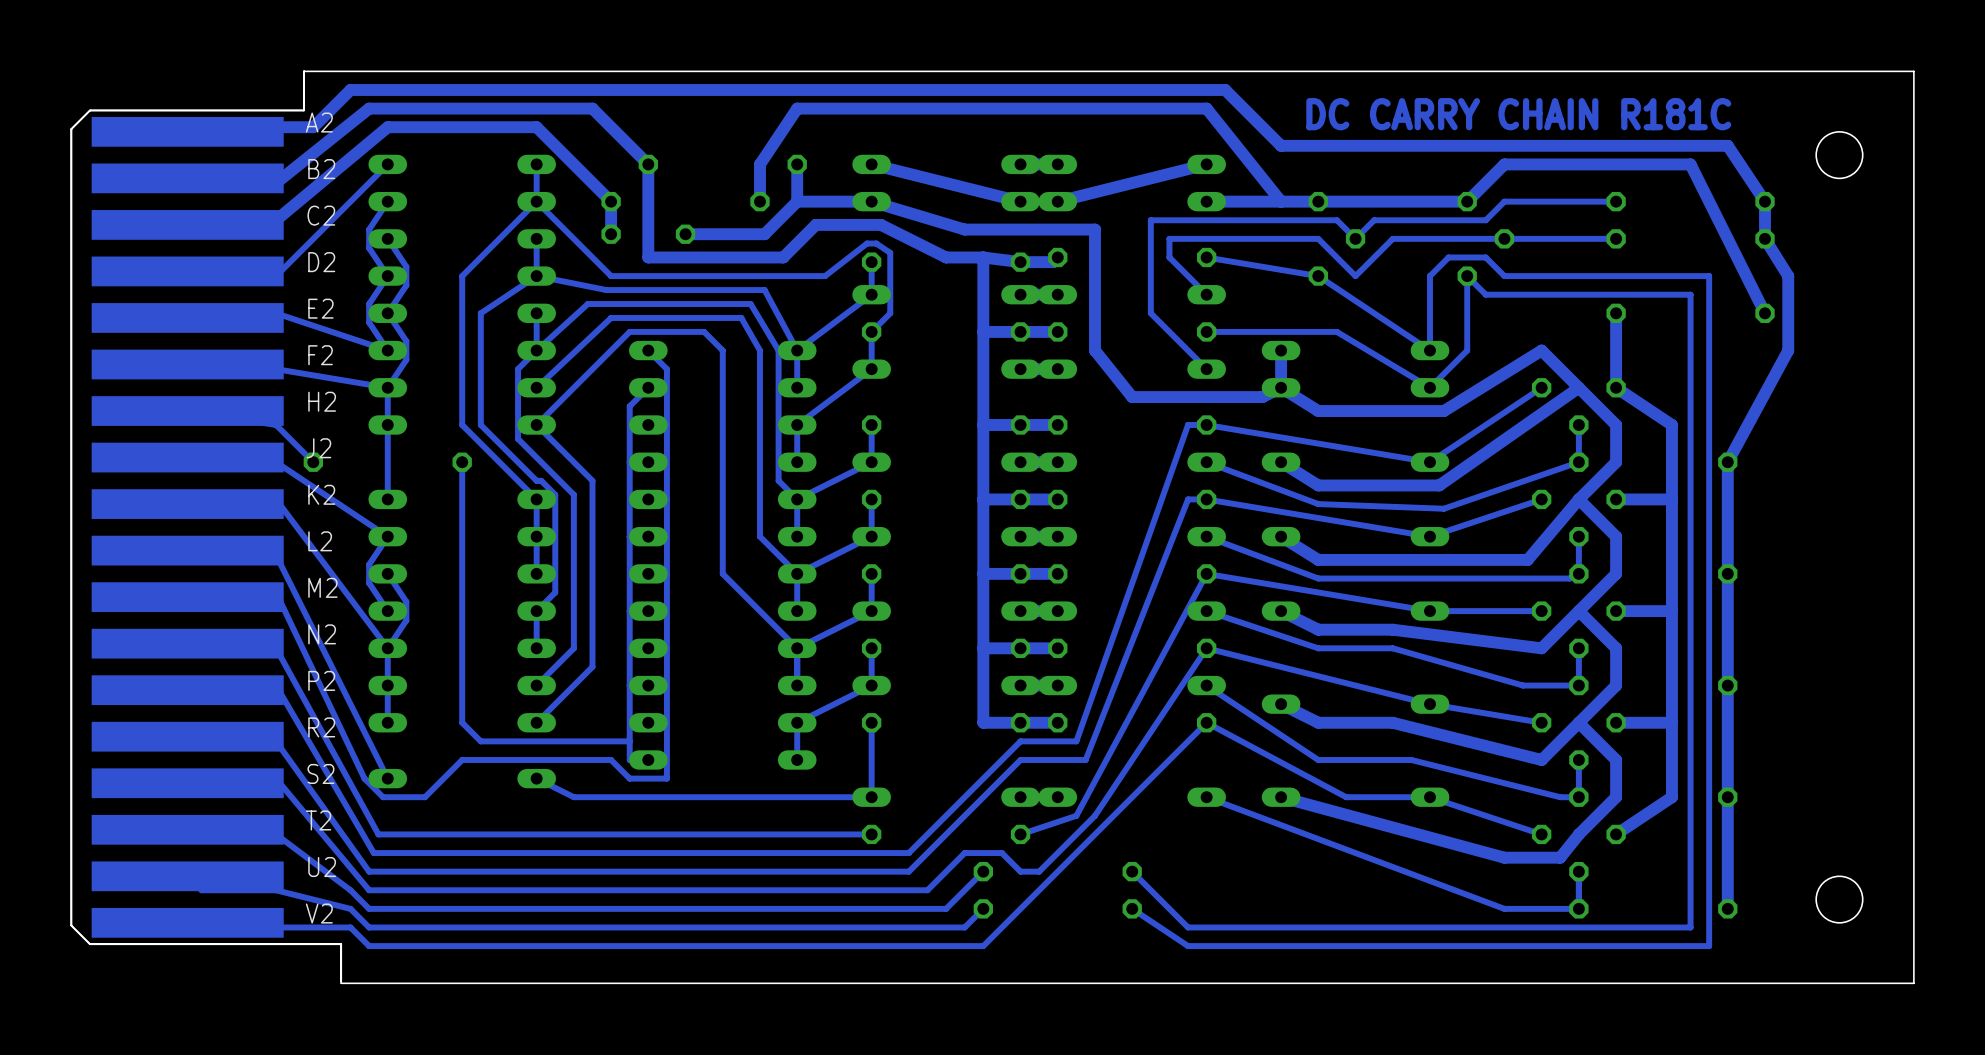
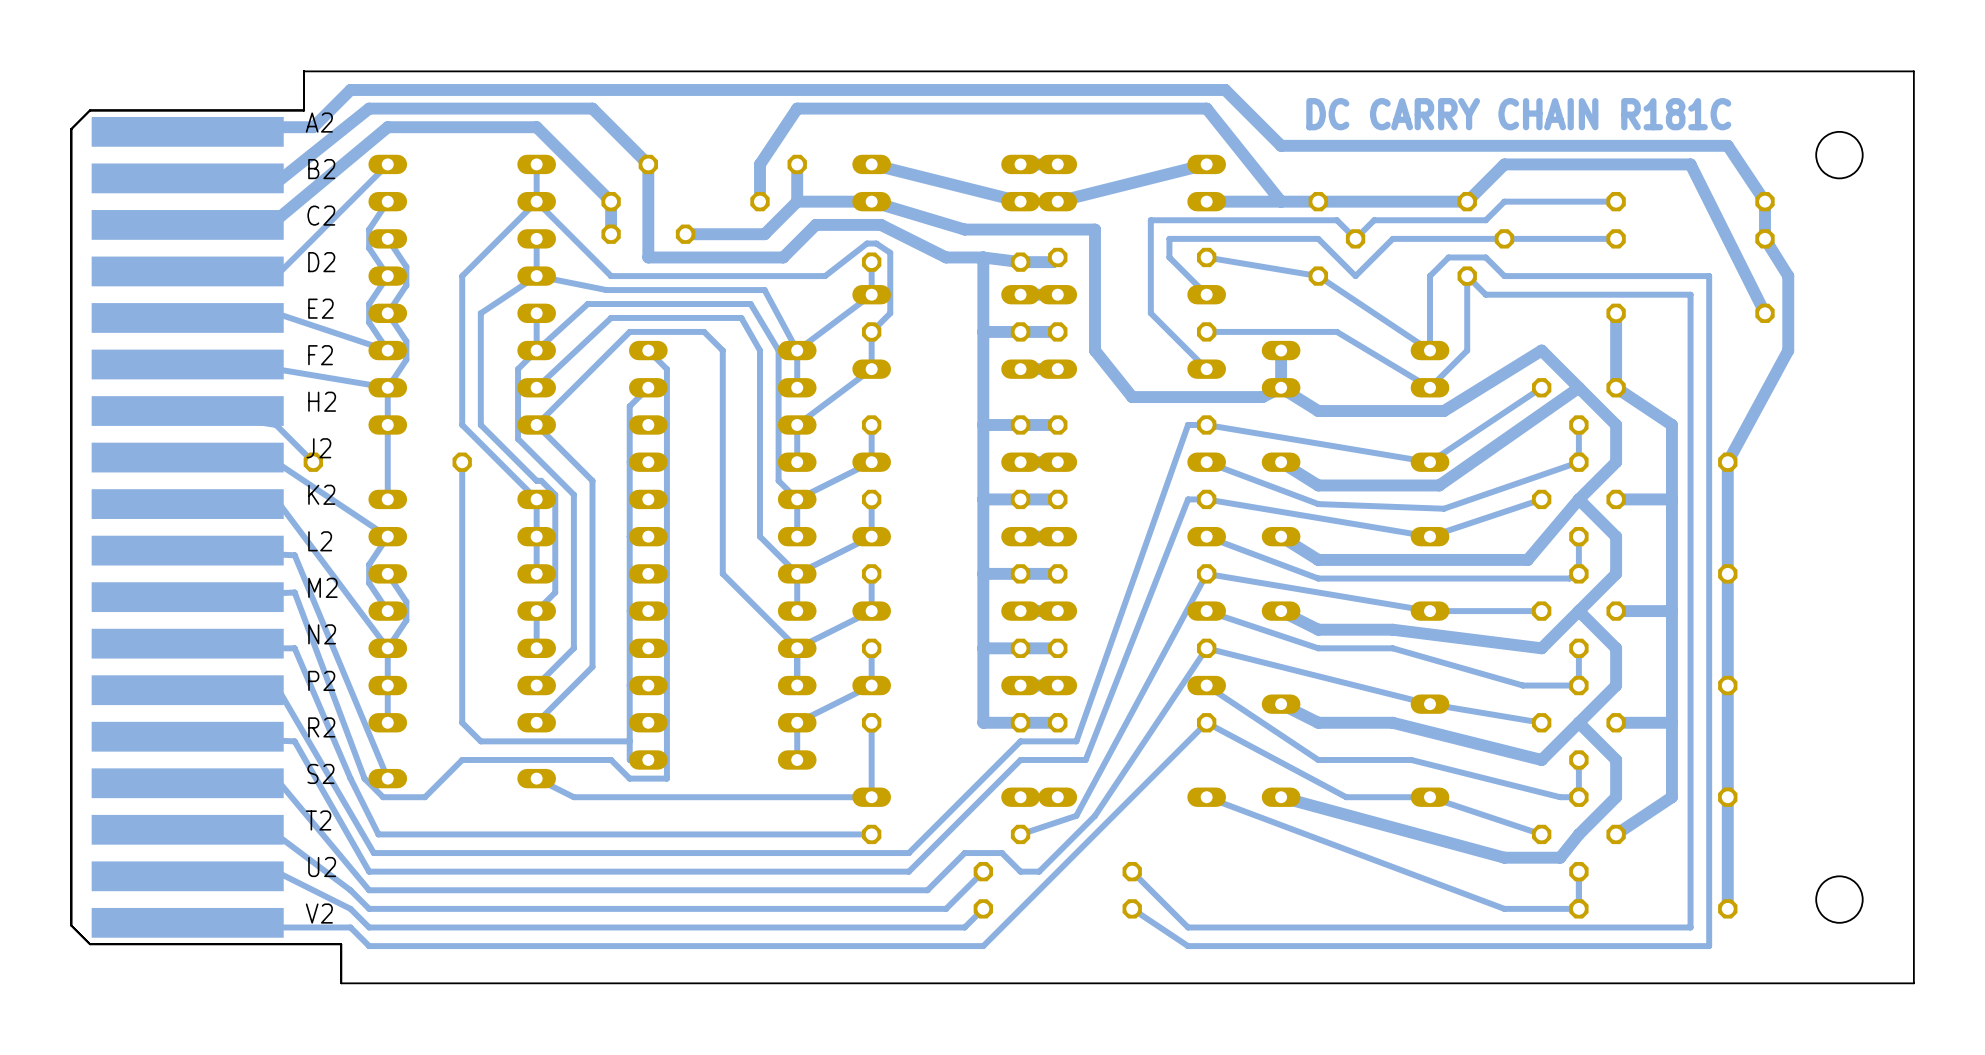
track: (187, 550) (276, 555) (387, 778) -> (187, 550) (294, 555) (387, 778)
track: (187, 597) (276, 592) (364, 778) -> (187, 597) (294, 592) (364, 778)
track: (276, 648) (378, 834) -> (276, 648) (294, 648) (350, 778) (378, 834)
track: (187, 736) (276, 741) (369, 871) -> (187, 736) (294, 741) (369, 871)
track: (187, 876) (201, 890) (276, 890) (350, 908) -> (187, 876) (201, 871) (276, 871) (350, 908)

